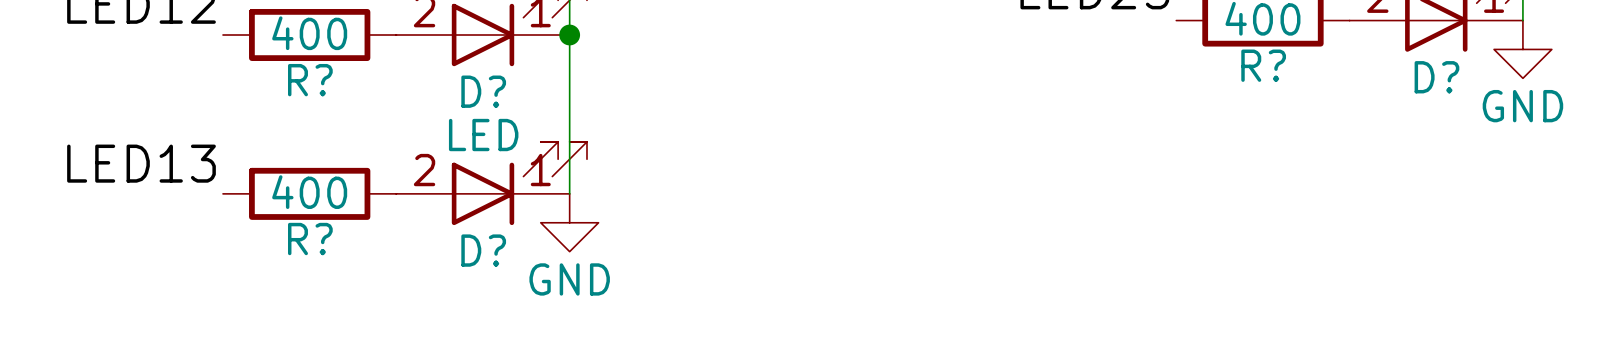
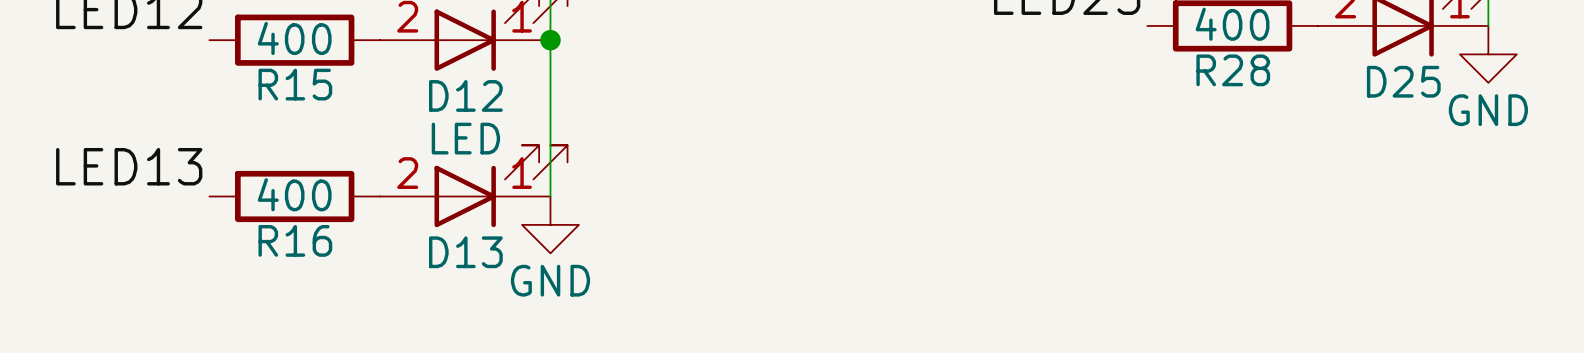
R? name: R? (1263, 65) -> R28 (1233, 70)
D? name: D? (1436, 77) -> D25 (1403, 81)
R? name: R? (310, 80) -> R15 (295, 84)
D? name: D? (483, 91) -> D12 (465, 95)
R? name: R? (310, 239) -> R16 (295, 240)
D? name: D? (483, 250) -> D13 (465, 252)

